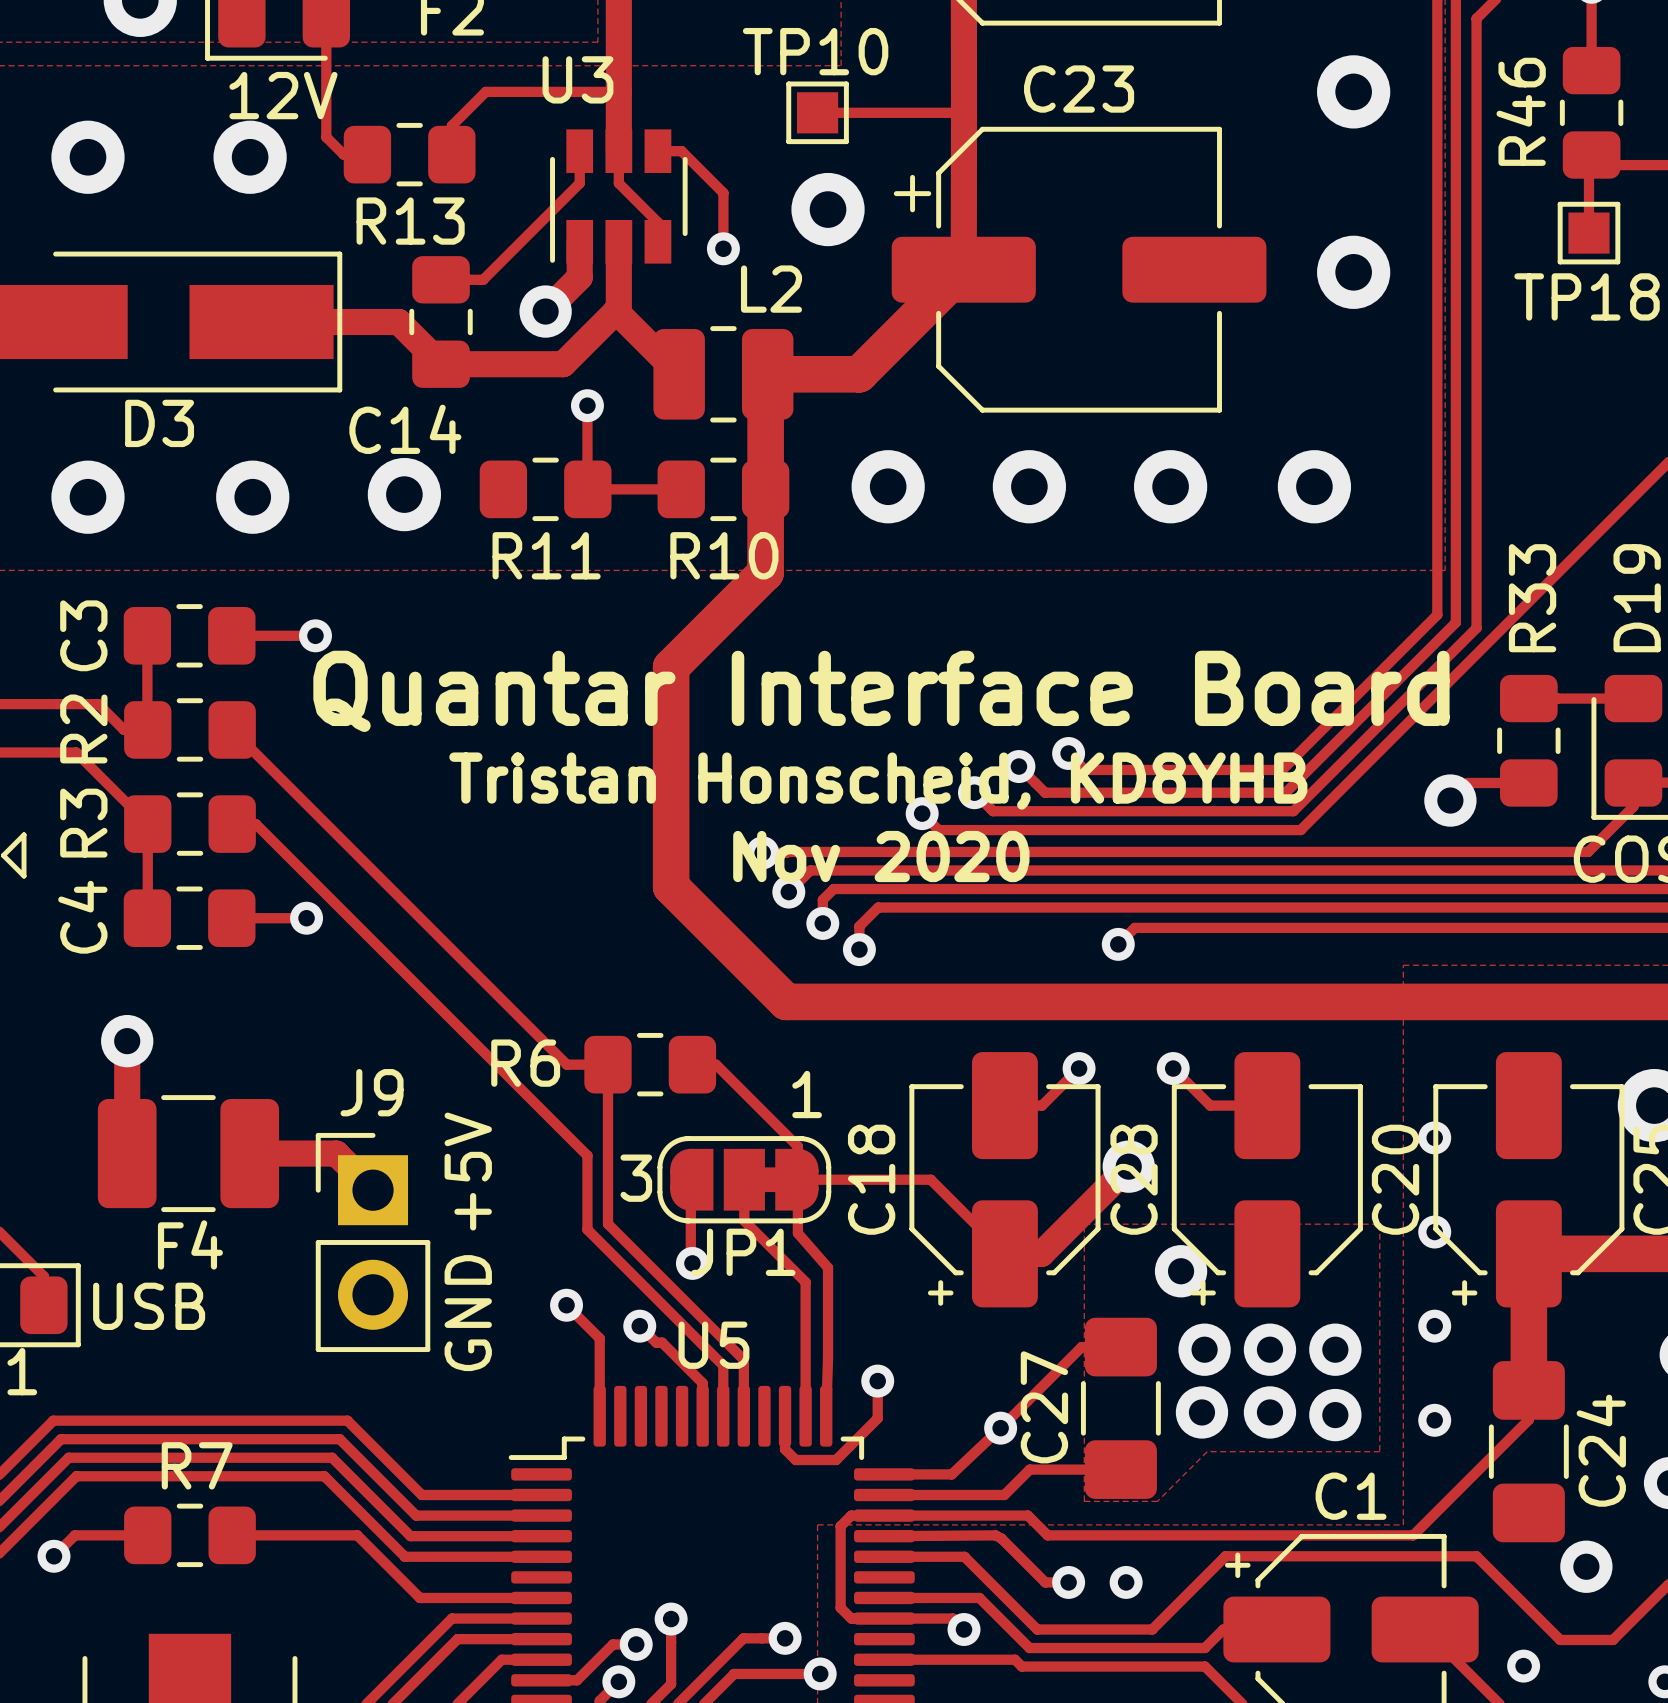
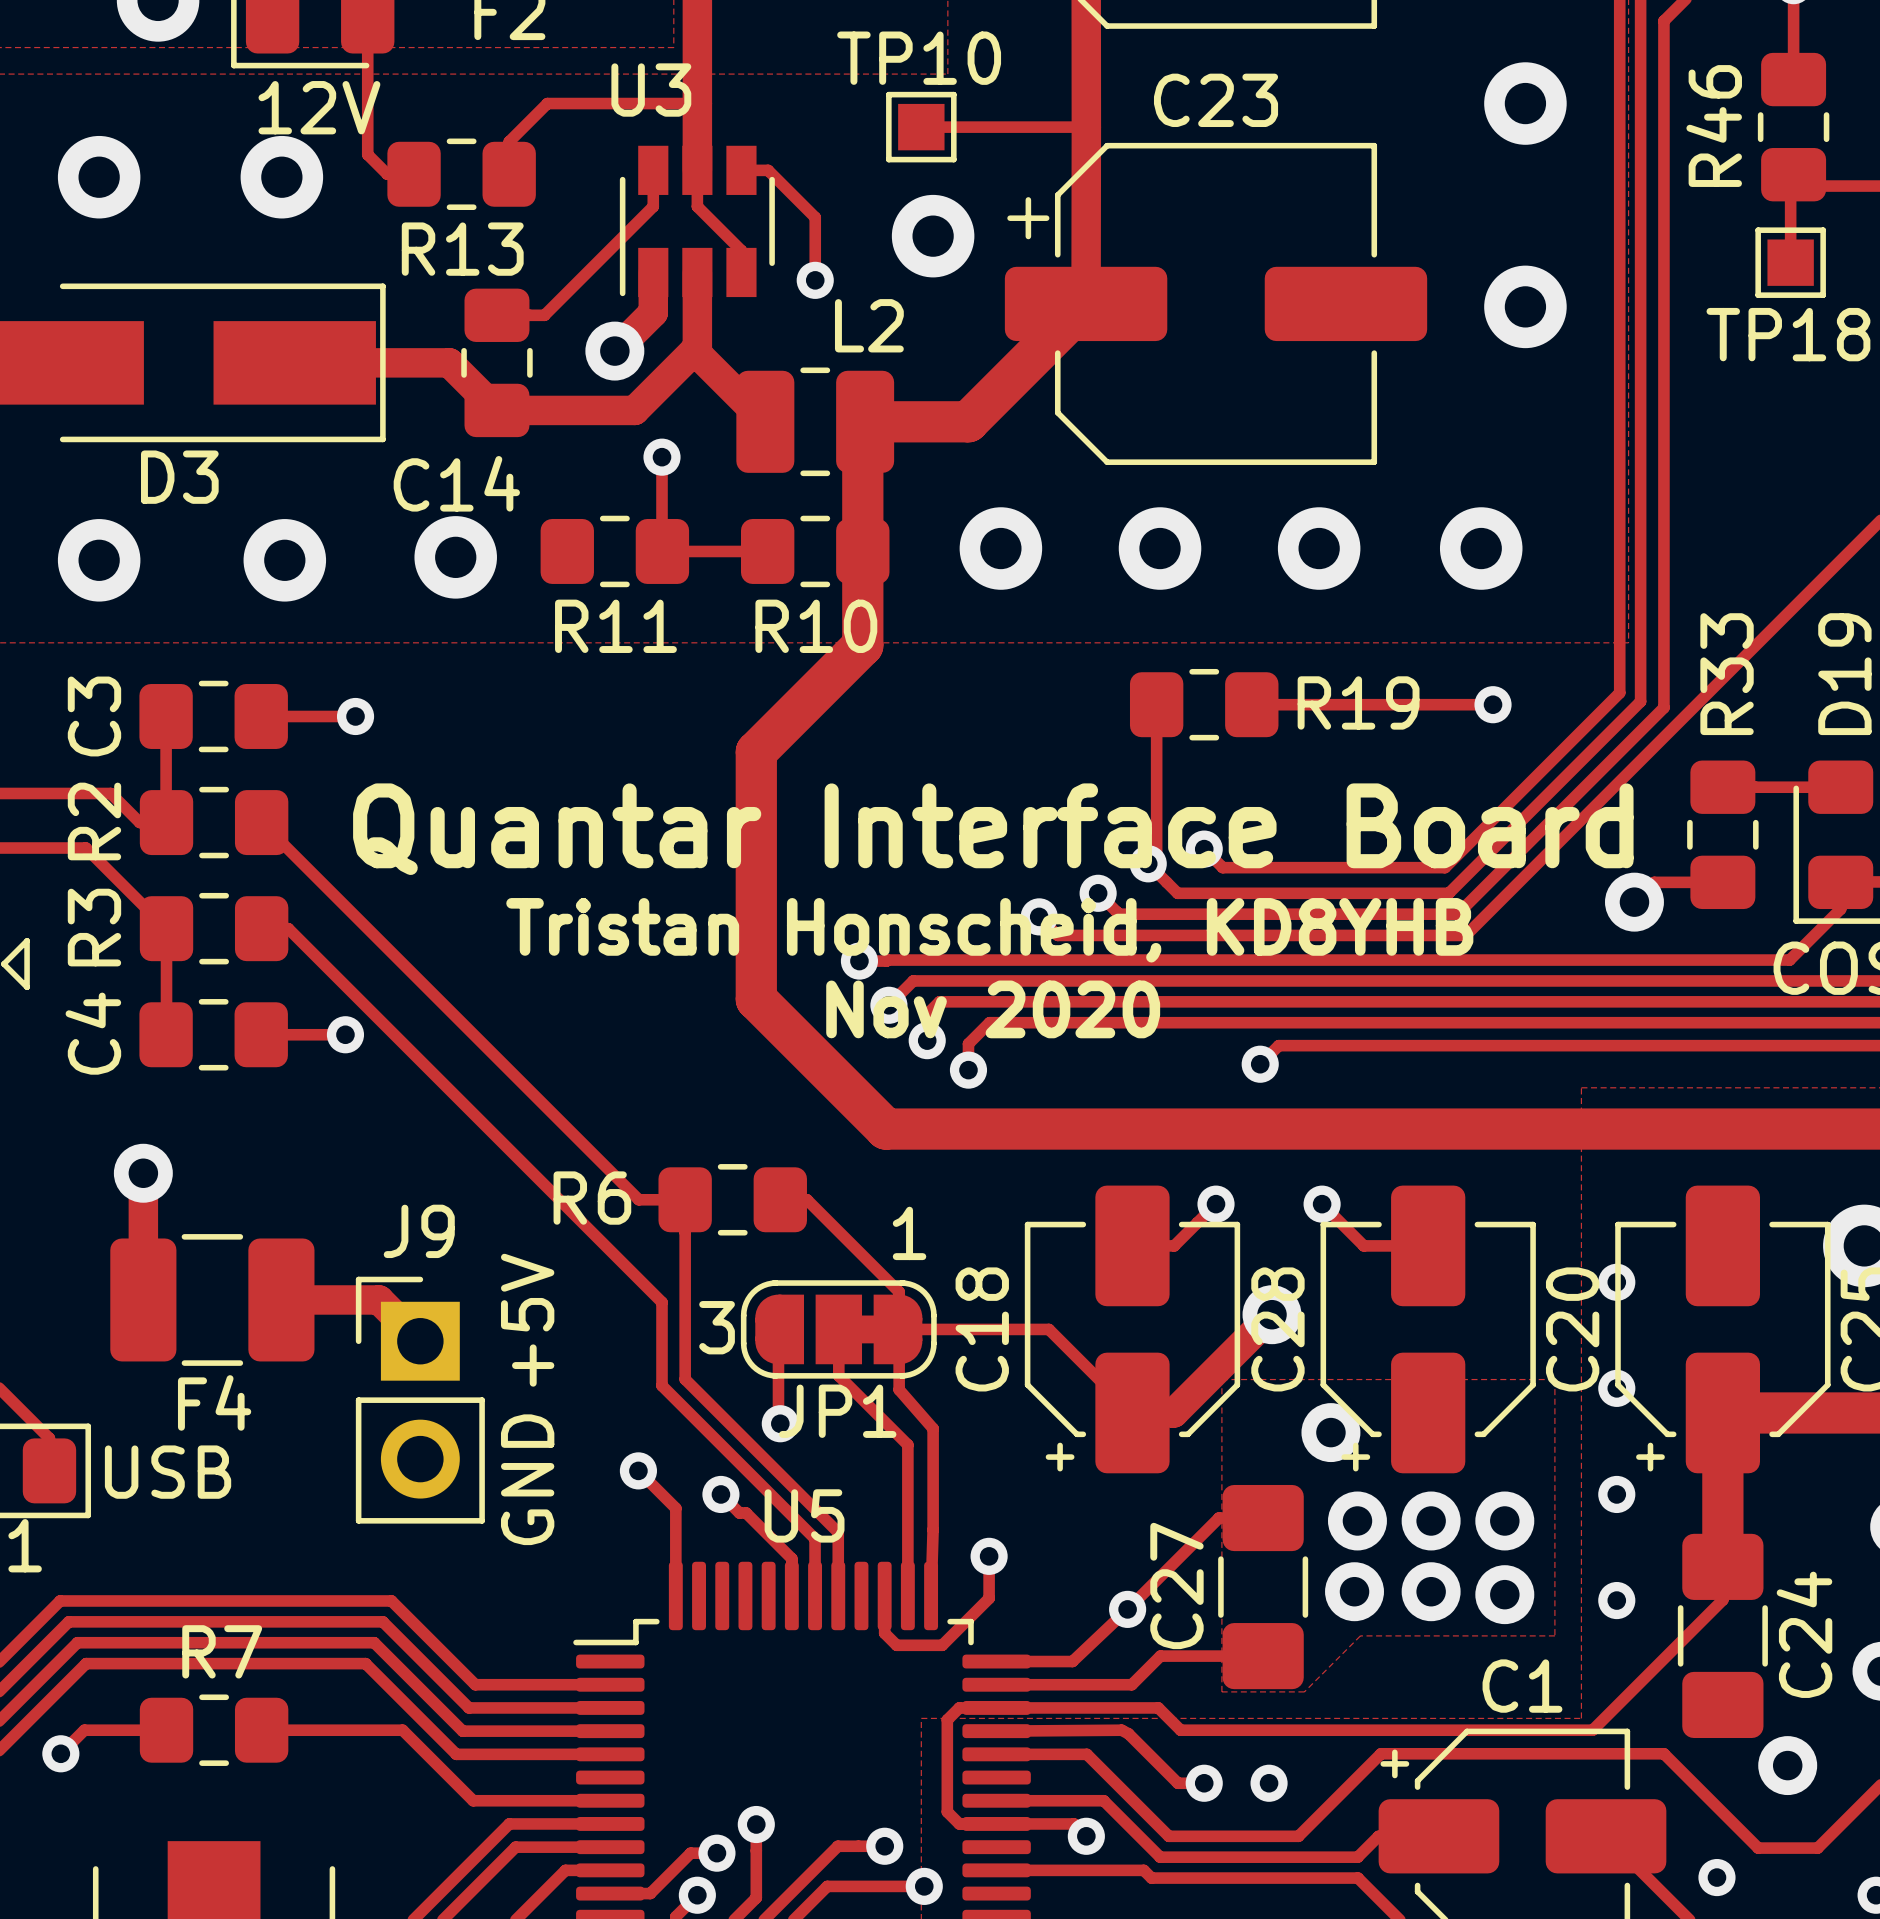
track: none -> (1156, 704) (1156, 855) (1148, 863)
R19: none -> (1204, 704)
track: none -> (1251, 704) (1493, 704)
via: none -> (1493, 704)
text position: Quantar Interface Board (881, 691) -> Quantar Interface Board (993, 829)
text position: Tristan Honscheid, KD8YHB (878, 781) -> Tristan Honscheid, KD8YHB (989, 930)
text position: Nov 2020 (881, 856) -> Nov 2020 (993, 1009)

